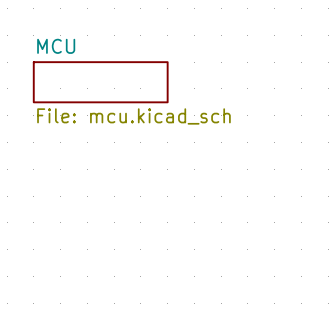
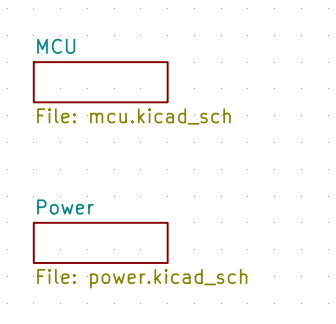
sheet Power: none -> File: power.kicad_sch (100, 242)

